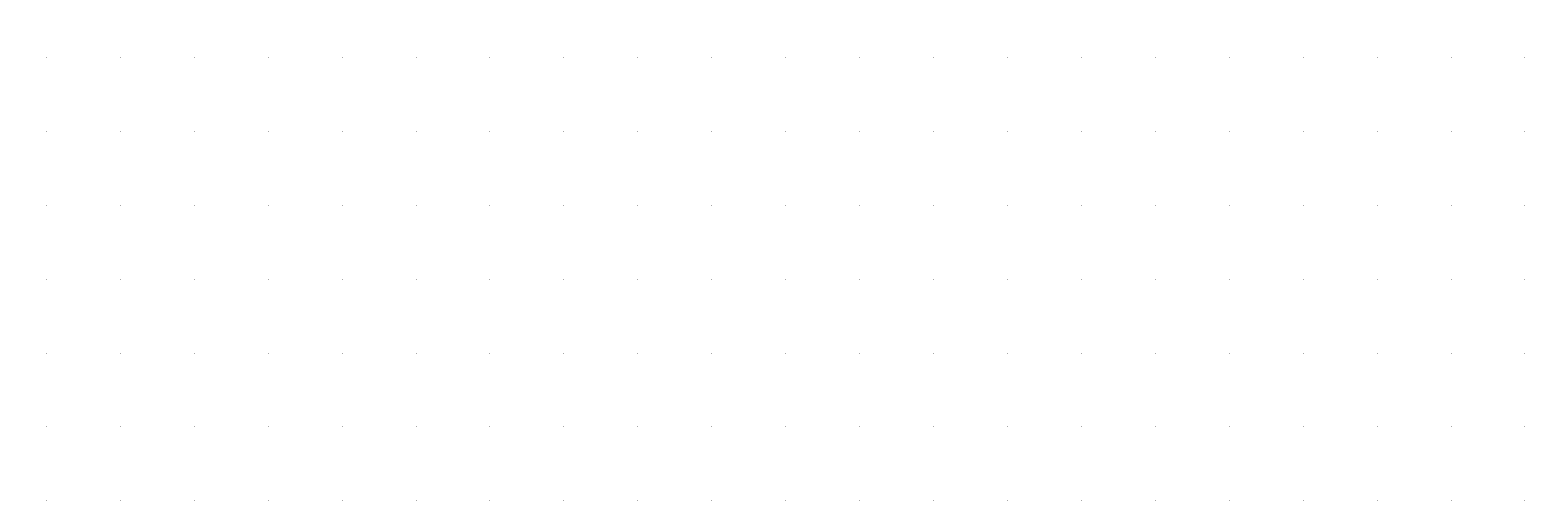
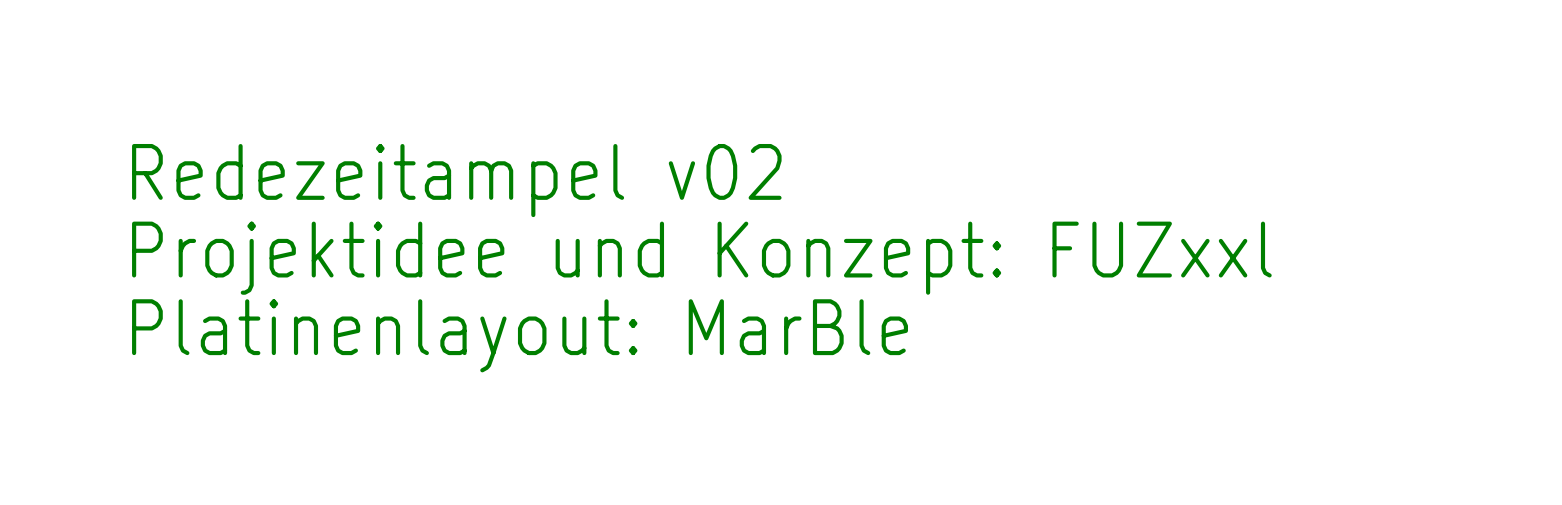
text: none -> Redezeitampel v02 (456, 180)
text: none -> Projektidee und Konzept: FUZxxl (701, 258)
text: none -> Platinenlayout: MarBle (520, 335)

